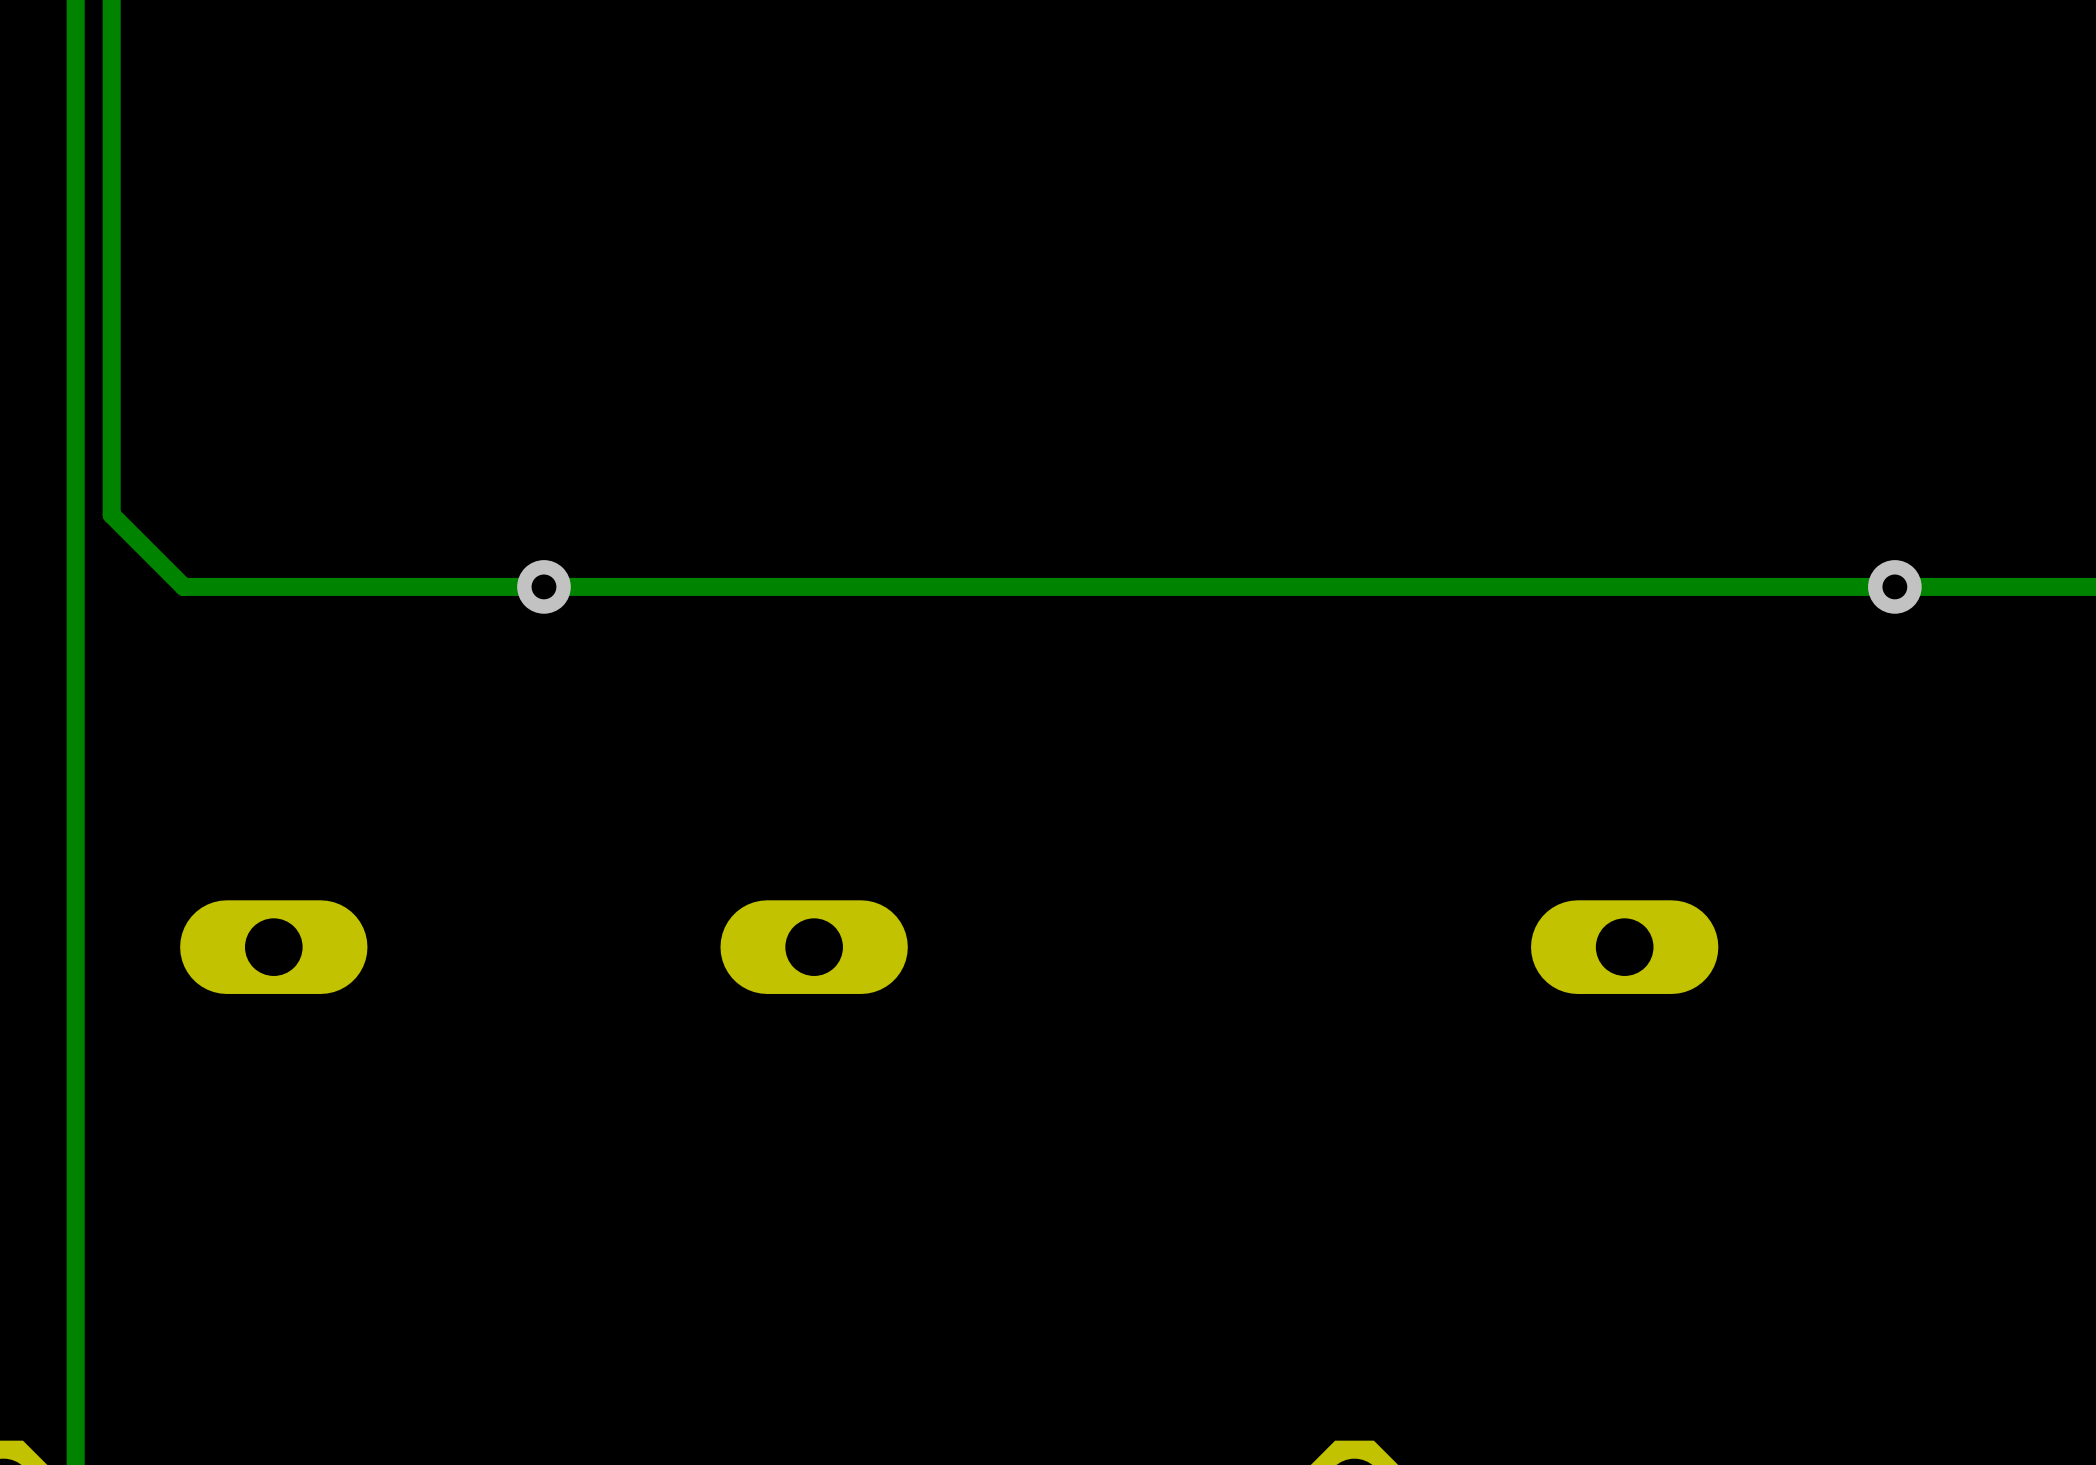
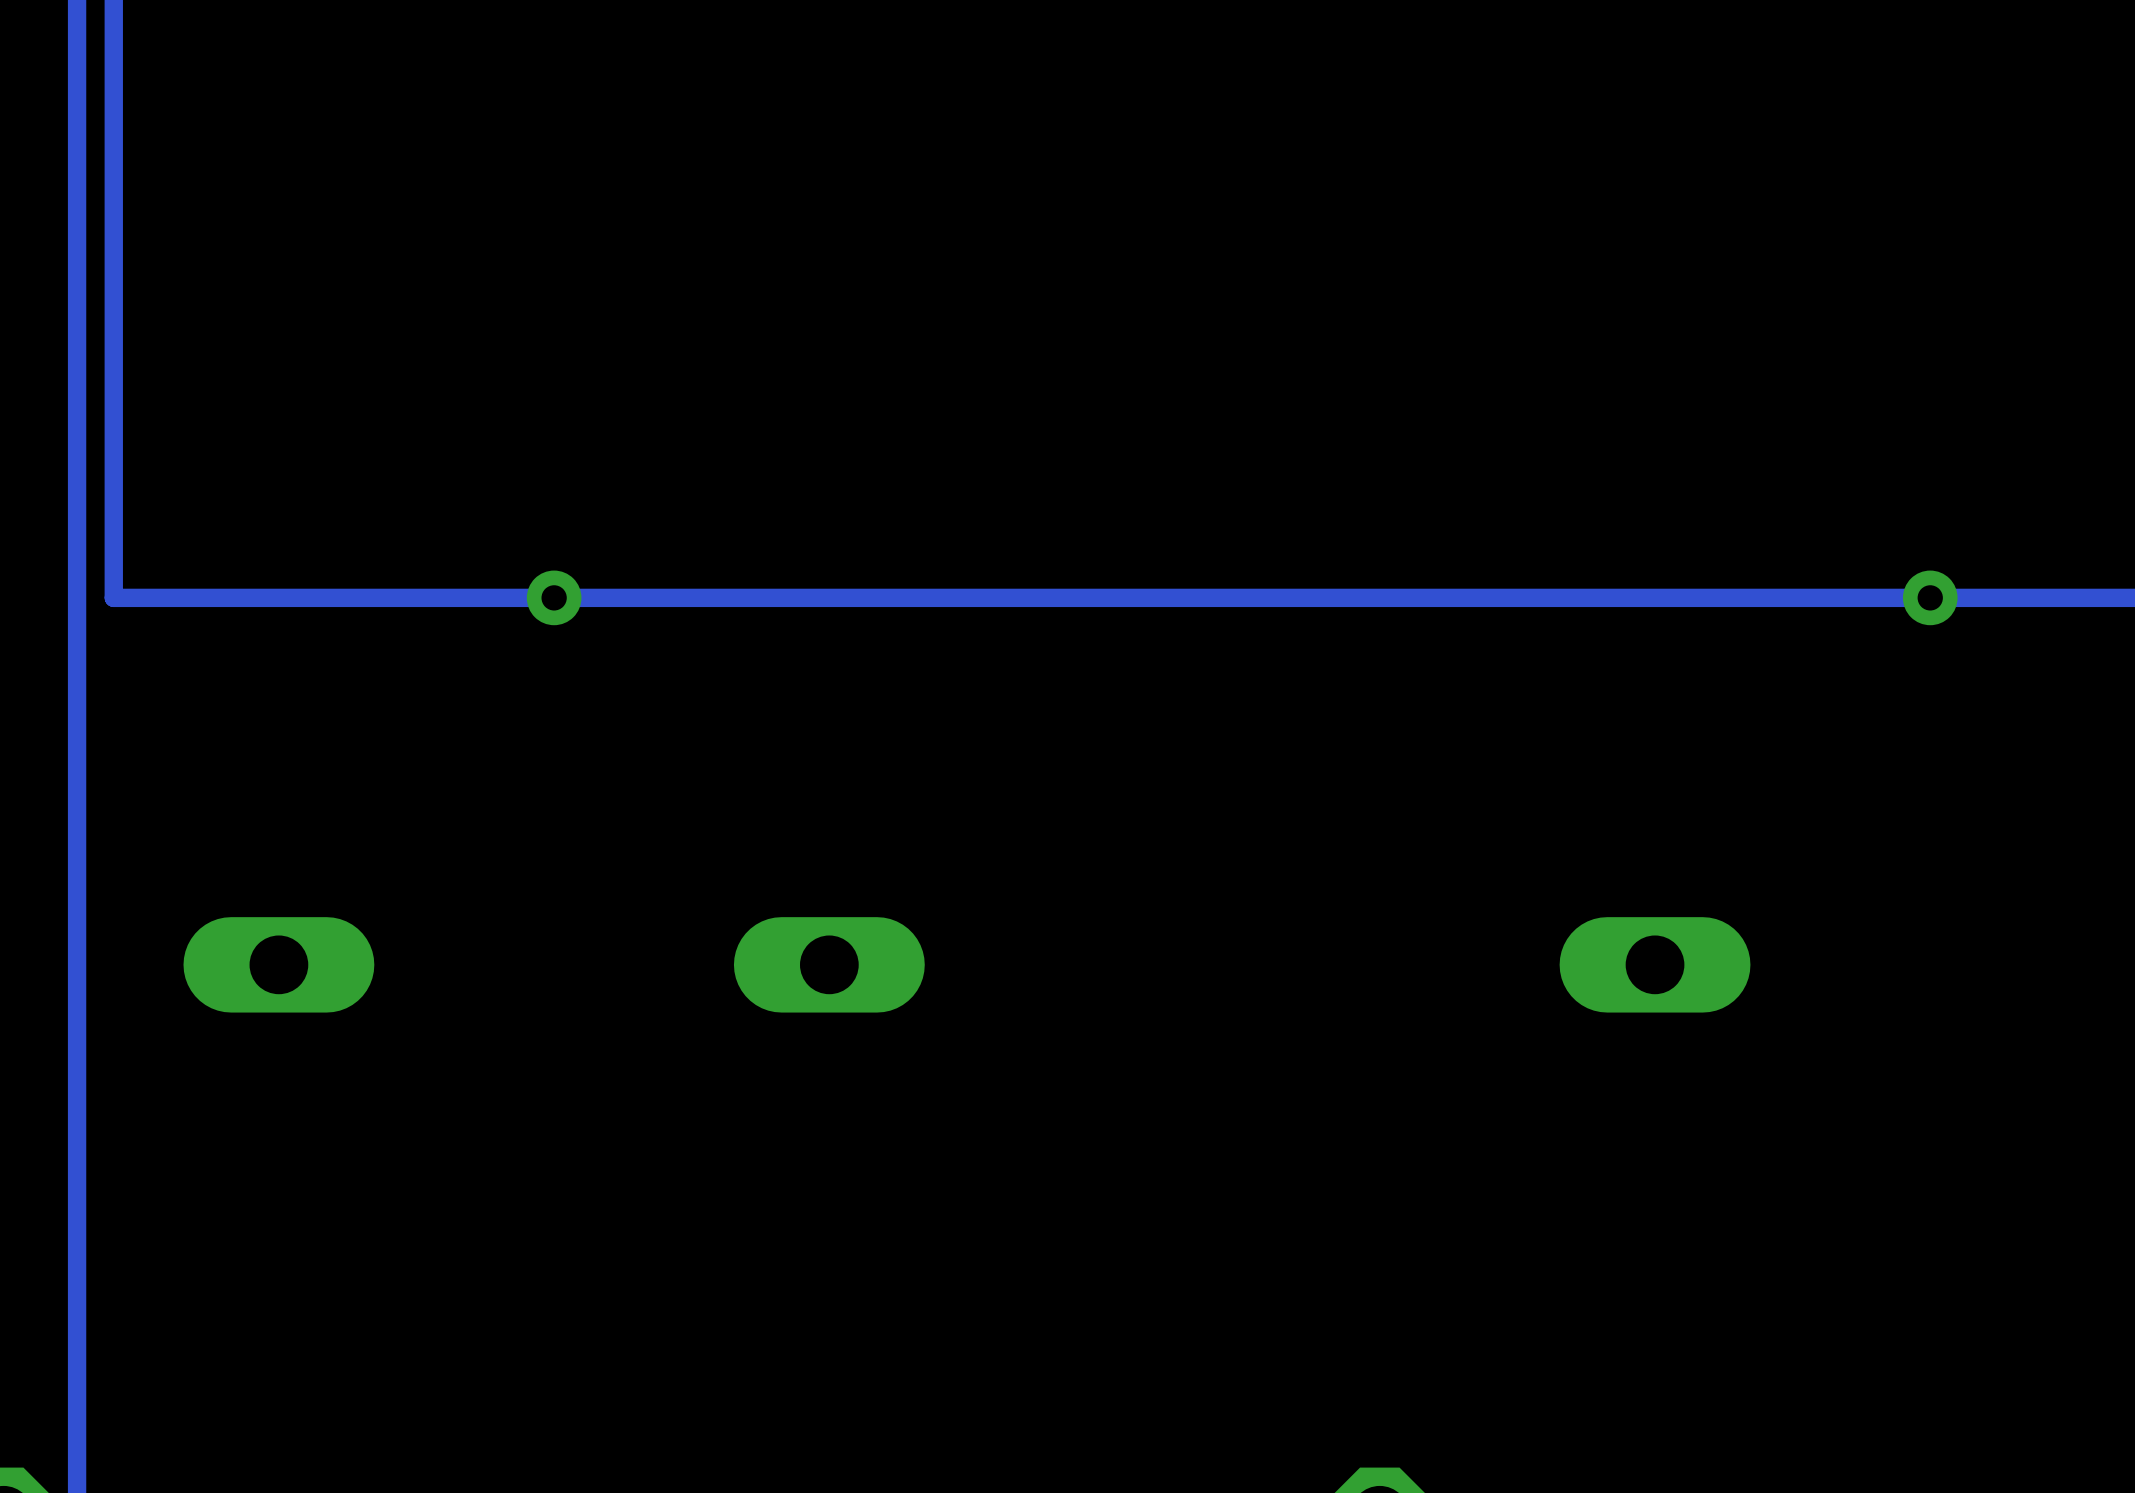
track: (111, 514) (183, 586) -> (113, 524) (113, 597) (187, 597)

